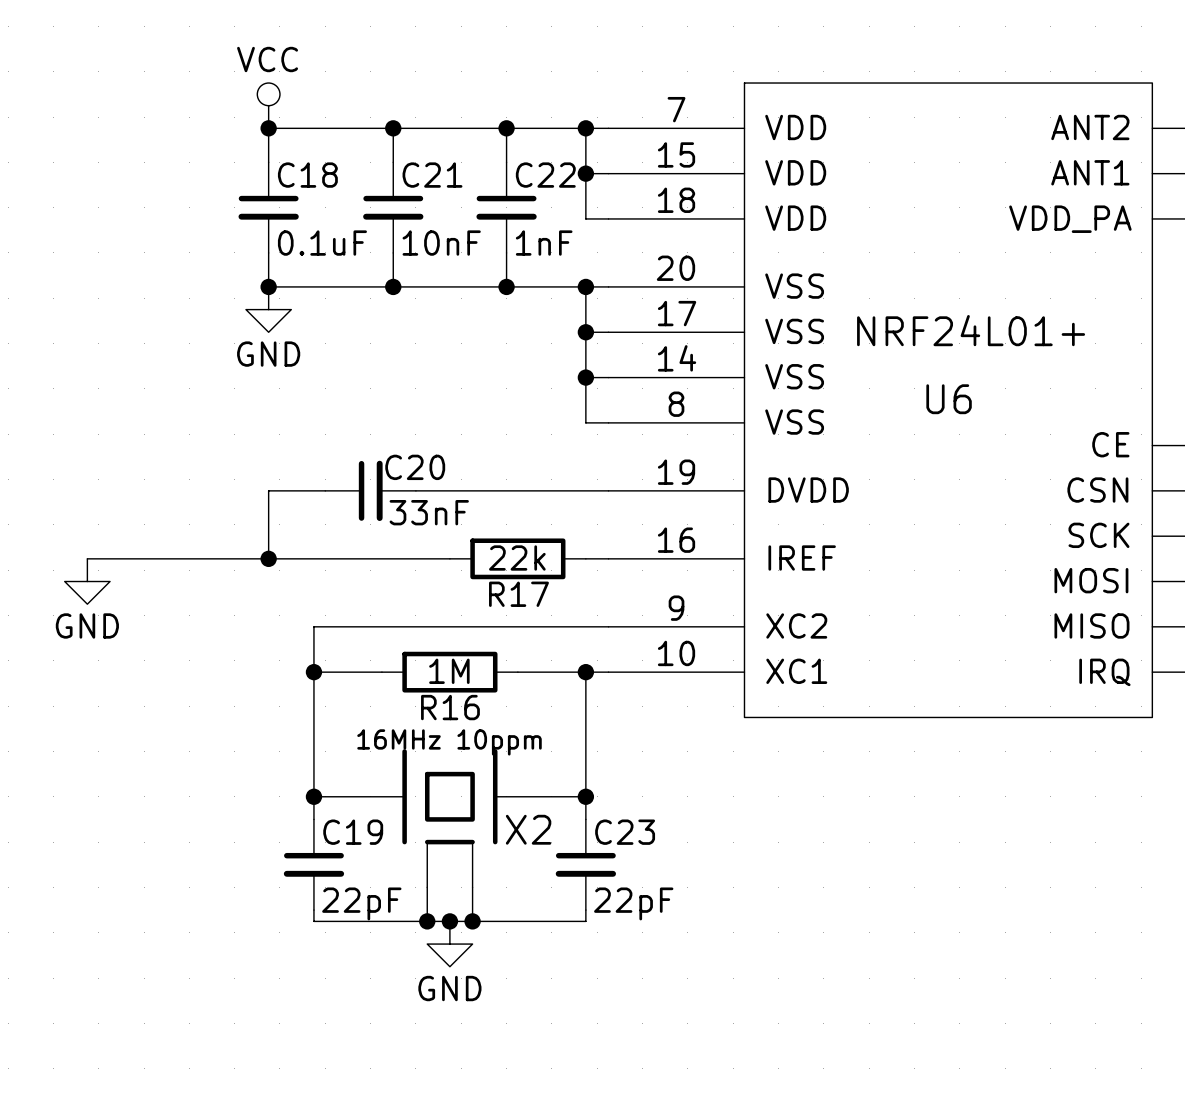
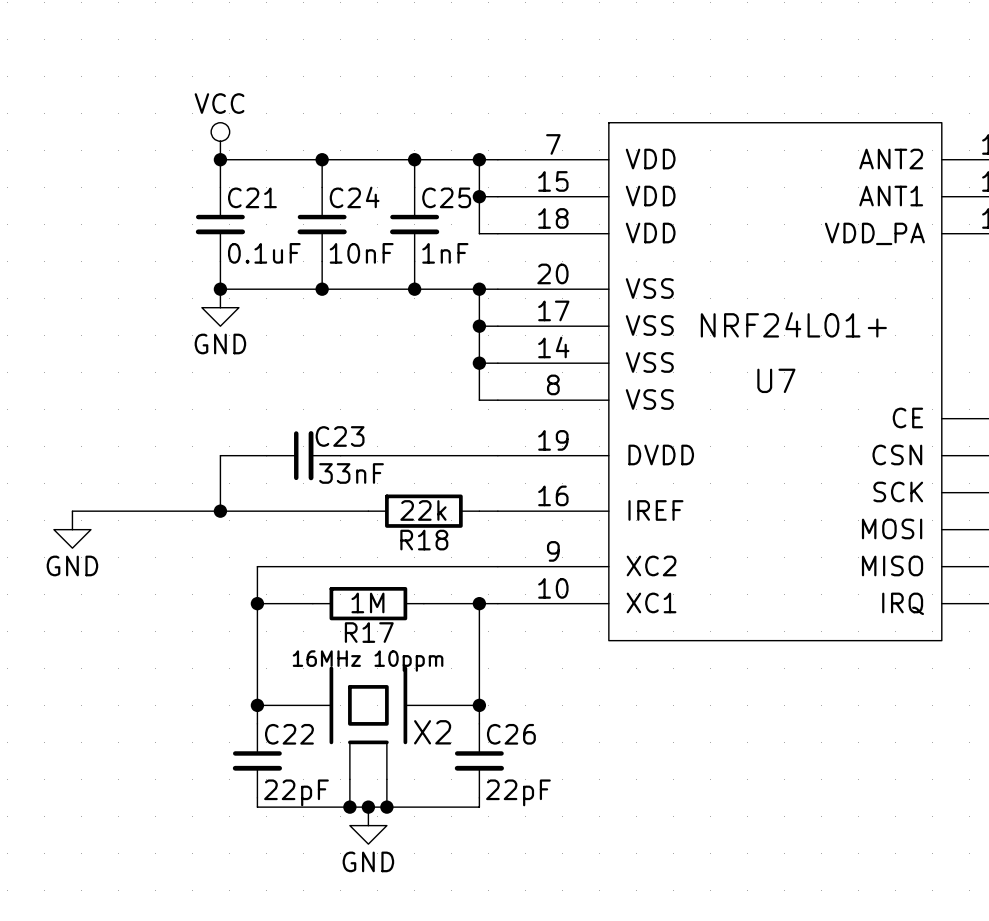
C18 name: C18 (307, 175) -> C21 (252, 197)
C21 name: C21 (432, 175) -> C24 (354, 197)
C22 name: C22 (545, 175) -> C25 (446, 197)
U6 name: U6 (949, 399) -> U7 (776, 380)
C20 name: C20 (415, 467) -> C23 (340, 436)
R17 name: R17 (518, 594) -> R18 (424, 540)
R16 name: R16 (450, 707) -> R17 (369, 632)
C19 name: C19 (353, 832) -> C22 (289, 734)
C23 name: C23 (625, 832) -> C26 (511, 734)

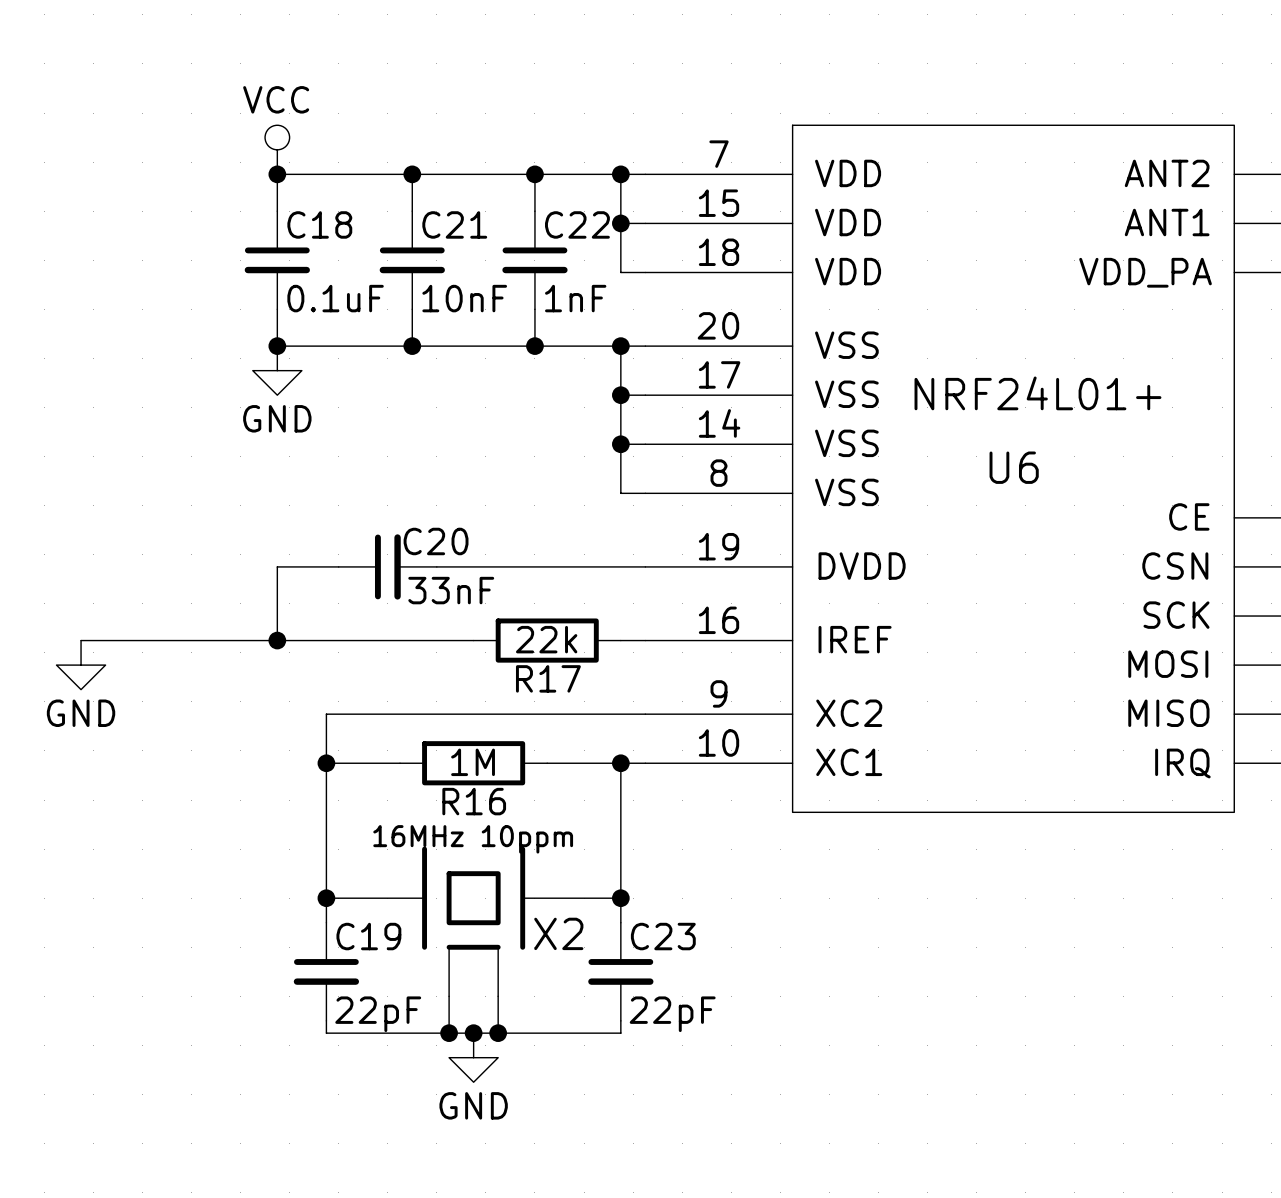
C21 name: C21 (252, 197) -> C18 (319, 224)
C24 name: C24 (354, 197) -> C21 (454, 224)
C25 name: C25 (446, 197) -> C22 (577, 224)
U7 name: U7 (776, 380) -> U6 (1014, 467)
C23 name: C23 (340, 436) -> C20 (436, 541)
R18 name: R18 (424, 540) -> R17 (548, 678)
R17 name: R17 (369, 632) -> R16 (474, 801)
C22 name: C22 (289, 734) -> C19 (368, 936)
C26 name: C26 (511, 734) -> C23 (663, 936)

